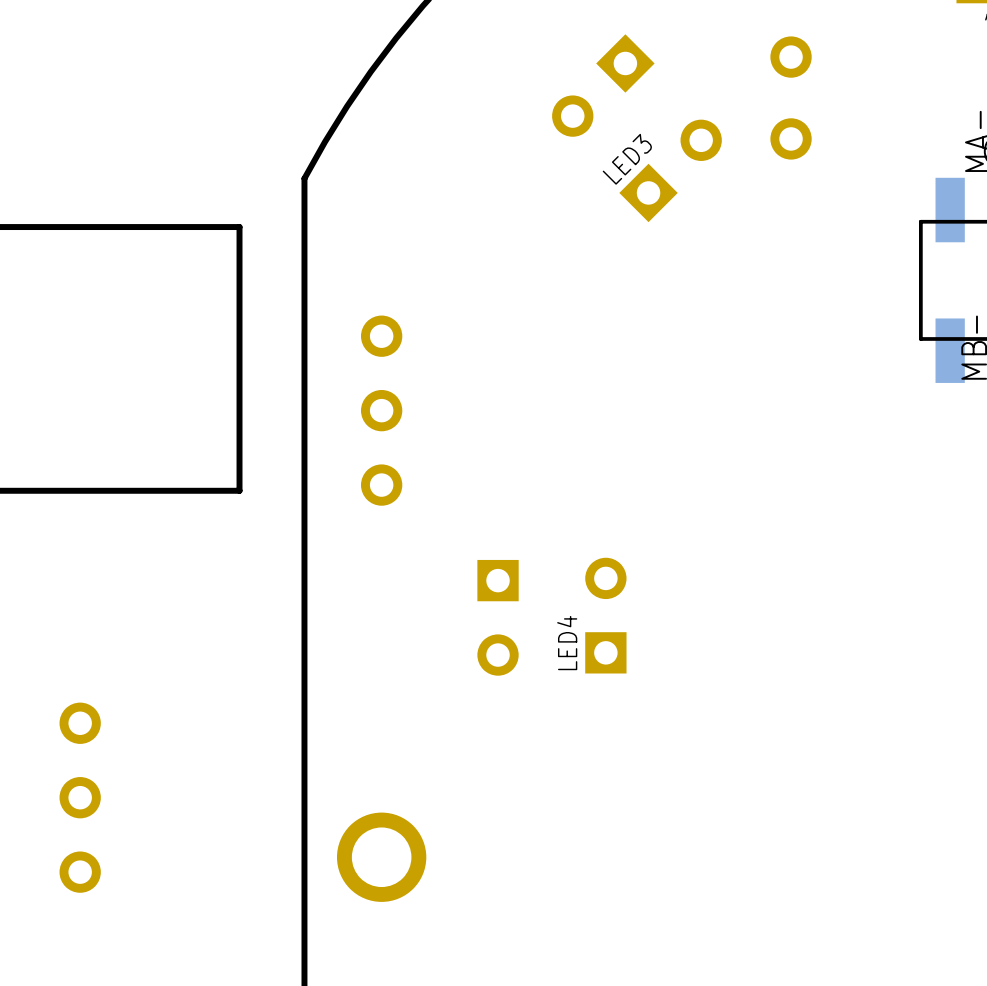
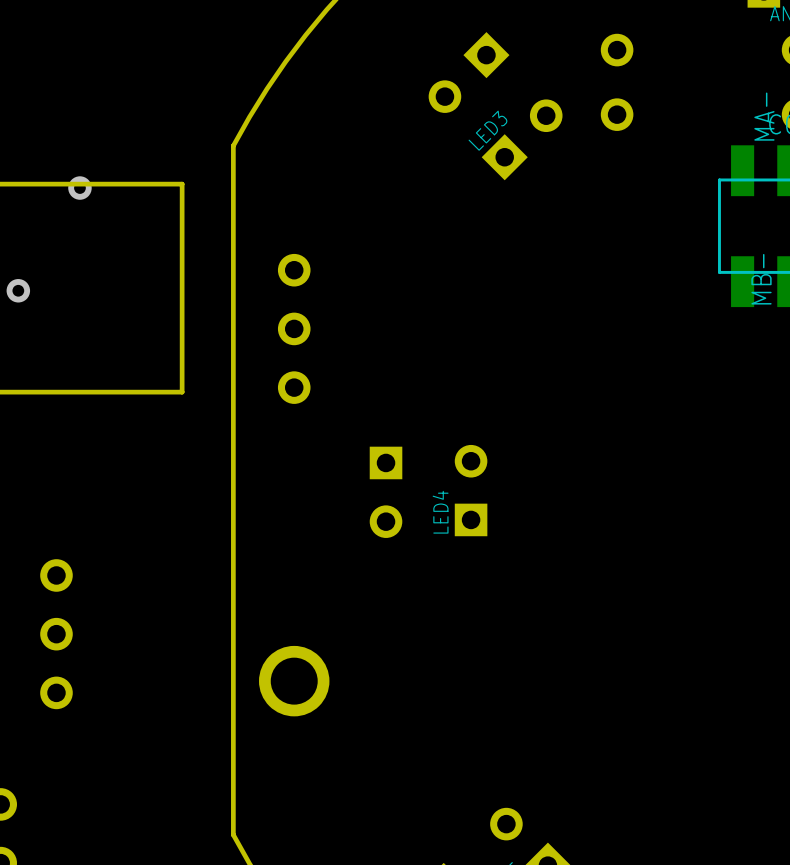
via: none -> (79, 188)
via: none -> (18, 290)

